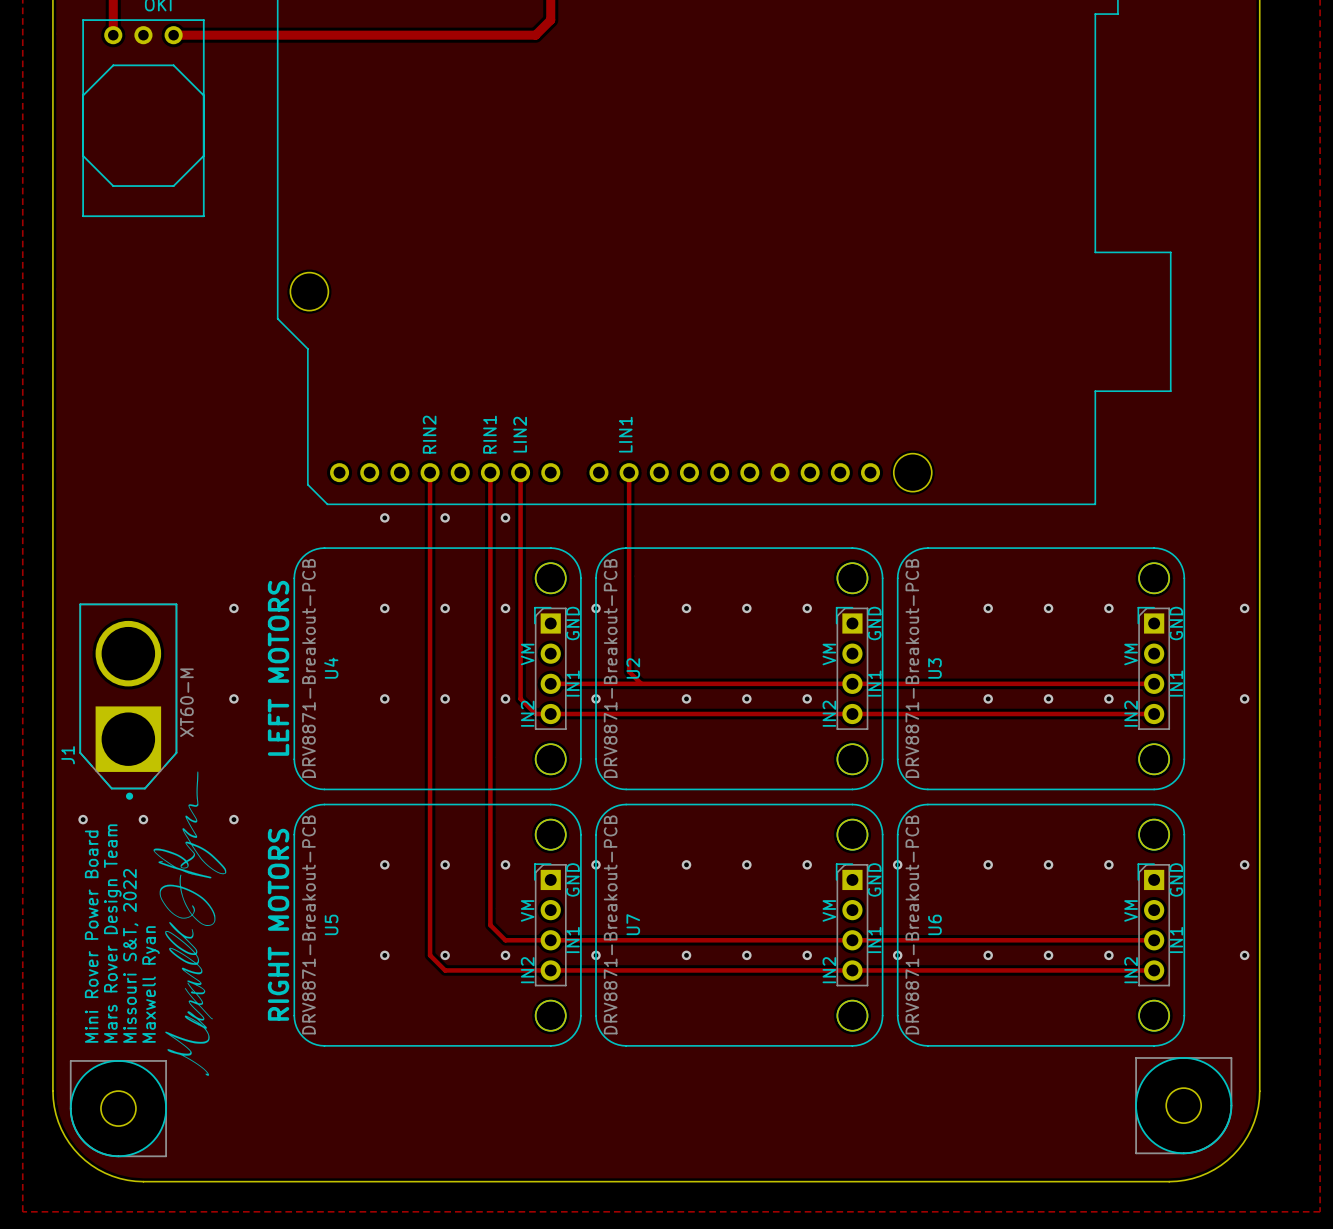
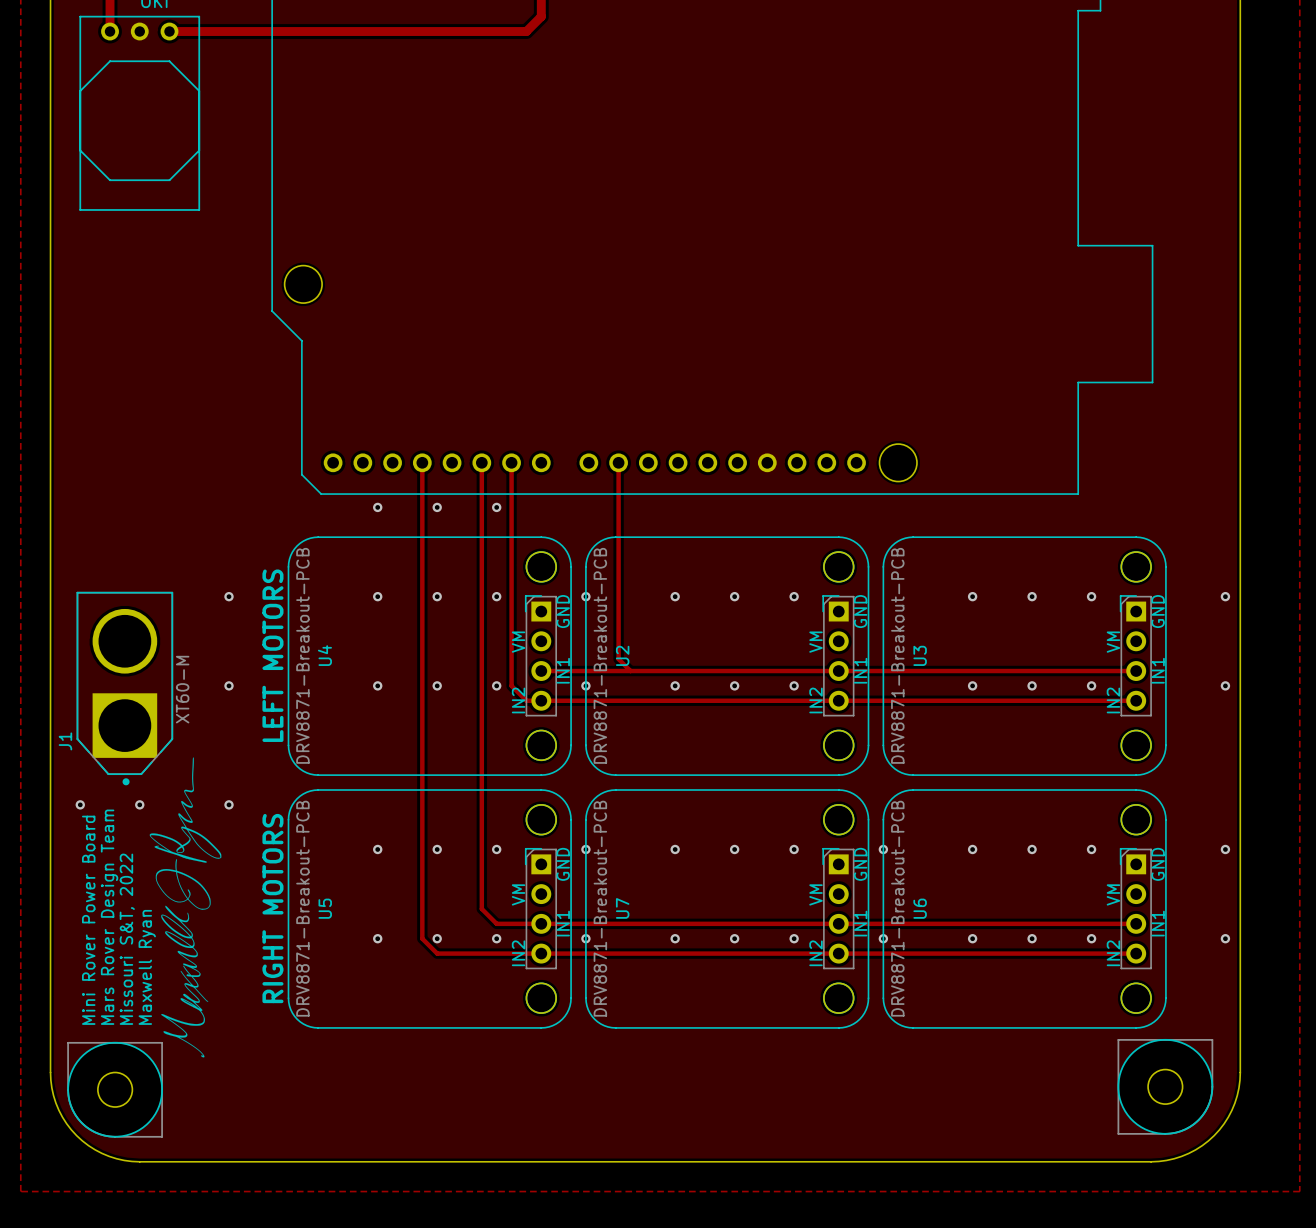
text: RIN2 (429, 434) -> none
text: RIN1 (489, 434) -> none
text: LIN2 (520, 434) -> none
text: LIN1 (625, 434) -> none

